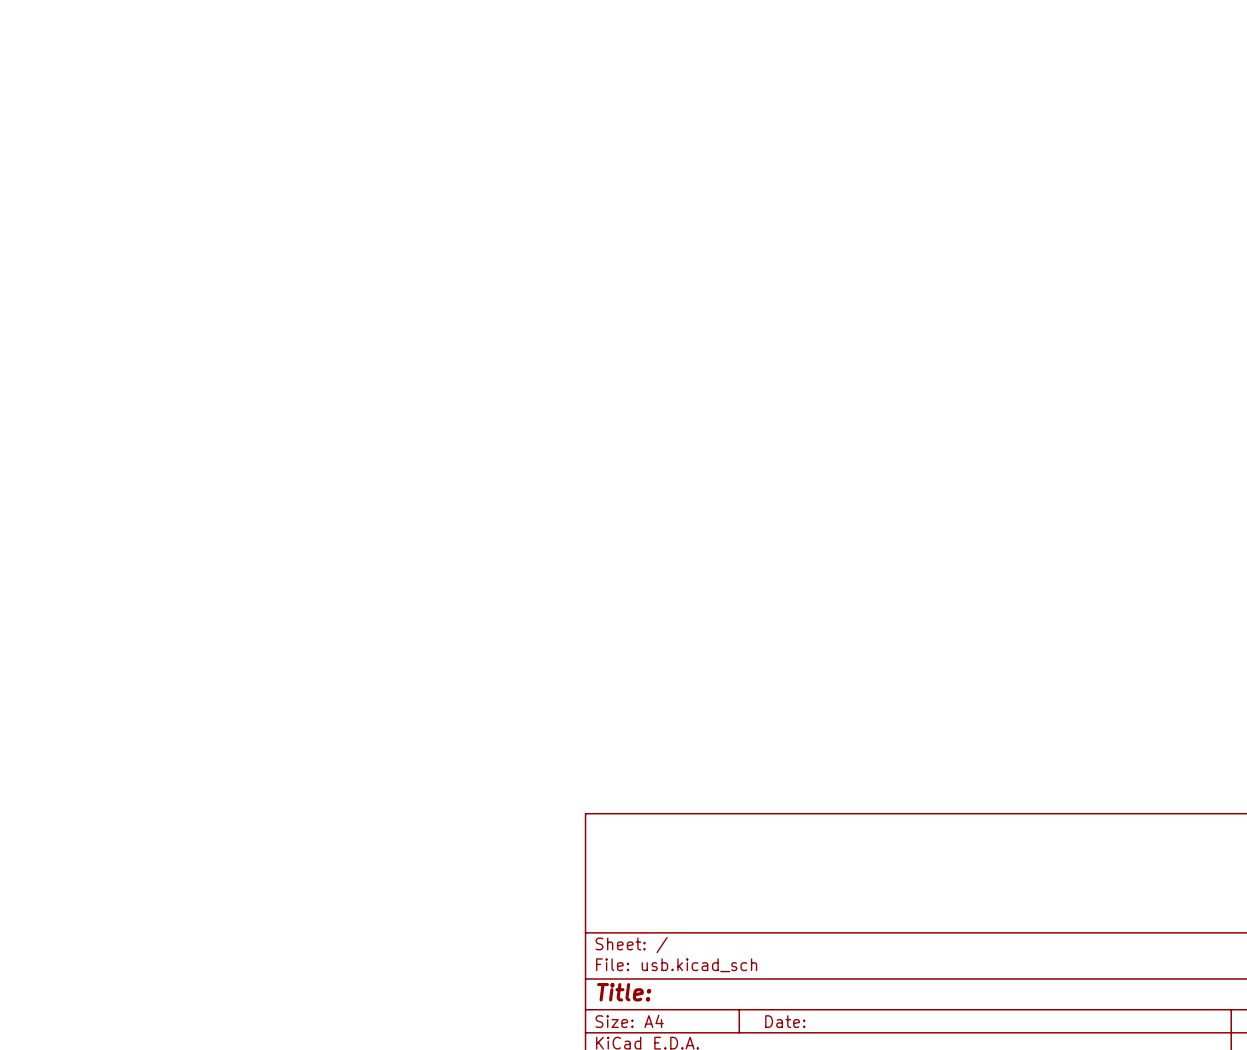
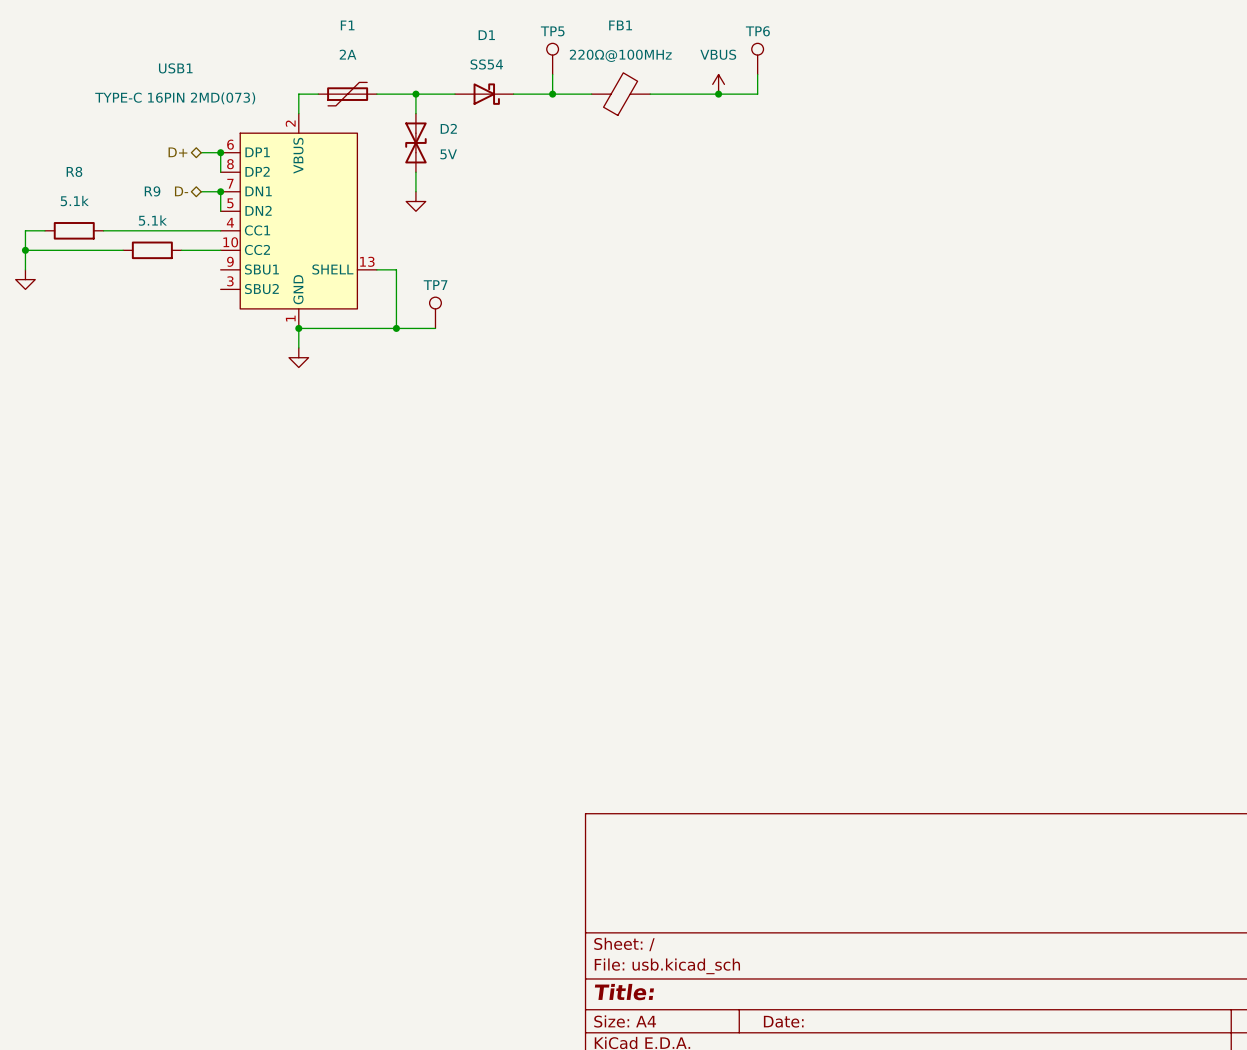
TP5: none -> (552, 58)
TP6: none -> (757, 58)
wire: none -> (552, 74) (552, 94)
wire: none -> (757, 74) (757, 94) (650, 94)
power symbol: none -> VBUS (718, 84)
wire: none -> (318, 94) (298, 94) (298, 113)
F1: none -> 2A (347, 94)
wire: none -> (376, 94) (455, 94)
wire: none -> (415, 94) (415, 113)
junction: none -> (415, 94)
D1: none -> SS54 (484, 94)
wire: none -> (513, 94) (591, 94)
junction: none -> (552, 94)
FB1: none -> 220Ω@100MHz (620, 94)
junction: none -> (718, 94)
D2: none -> 5V (415, 142)
hierarchical label: none -> D+ (177, 152)
wire: none -> (201, 152) (220, 152) (220, 172)
junction: none -> (220, 152)
wire: none -> (415, 172) (415, 191)
hierarchical label: none -> D- (181, 191)
wire: none -> (201, 191) (220, 191) (220, 211)
junction: none -> (220, 191)
power symbol: none -> (415, 201)
USB1: none -> TYPE-C 16PIN 2MD(073) (298, 221)
wire: none -> (44, 230) (25, 230) (25, 269)
R8: none -> 5.1k (74, 230)
wire: none -> (103, 230) (220, 230)
wire: none -> (25, 250) (123, 250)
junction: none -> (25, 250)
R9: none -> 5.1k (152, 250)
wire: none -> (181, 250) (220, 250)
wire: none -> (376, 269) (396, 269) (396, 328)
power symbol: none -> (25, 279)
TP7: none -> (435, 312)
junction: none -> (298, 328)
junction: none -> (396, 328)
wire: none -> (435, 328) (298, 328) (298, 347)
power symbol: none -> (298, 357)

